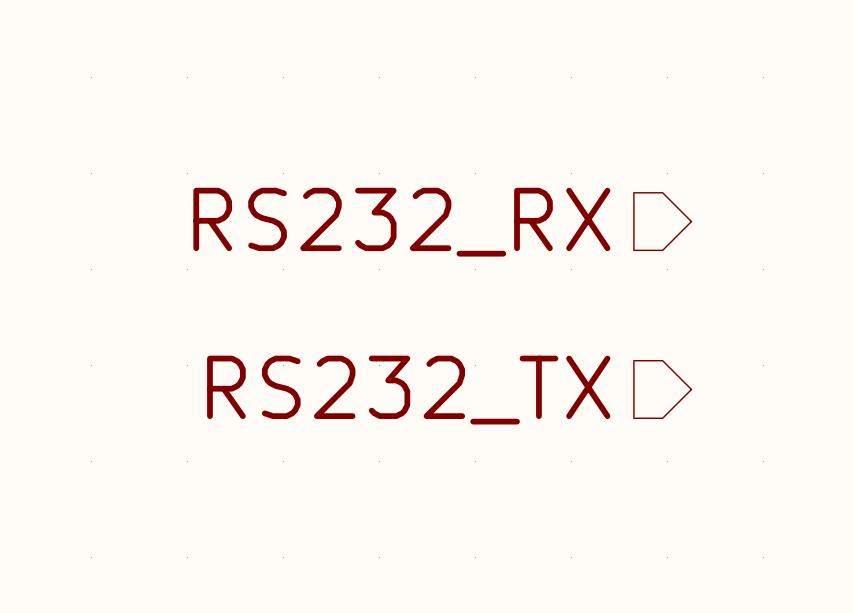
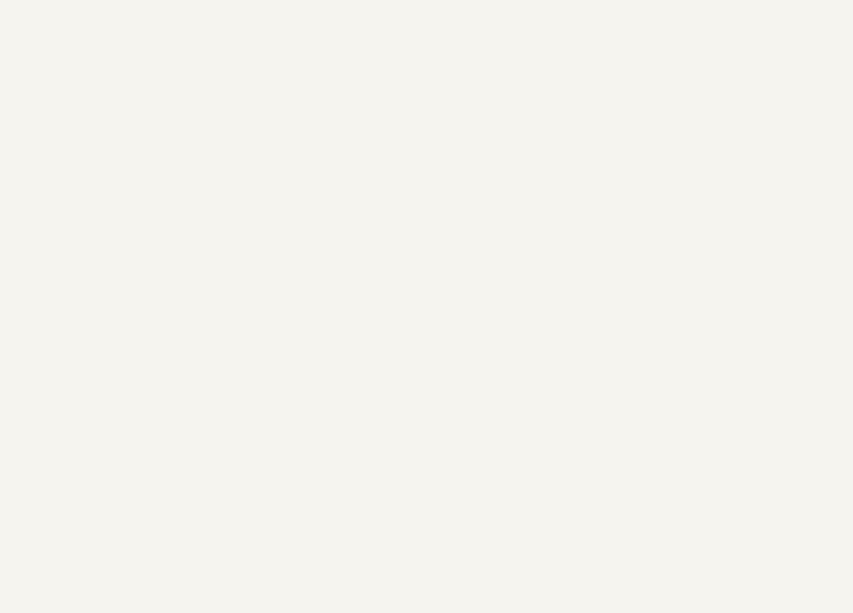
hierarchical label: RS232_RX (401, 222) -> none
hierarchical label: RS232_TX (408, 390) -> none

